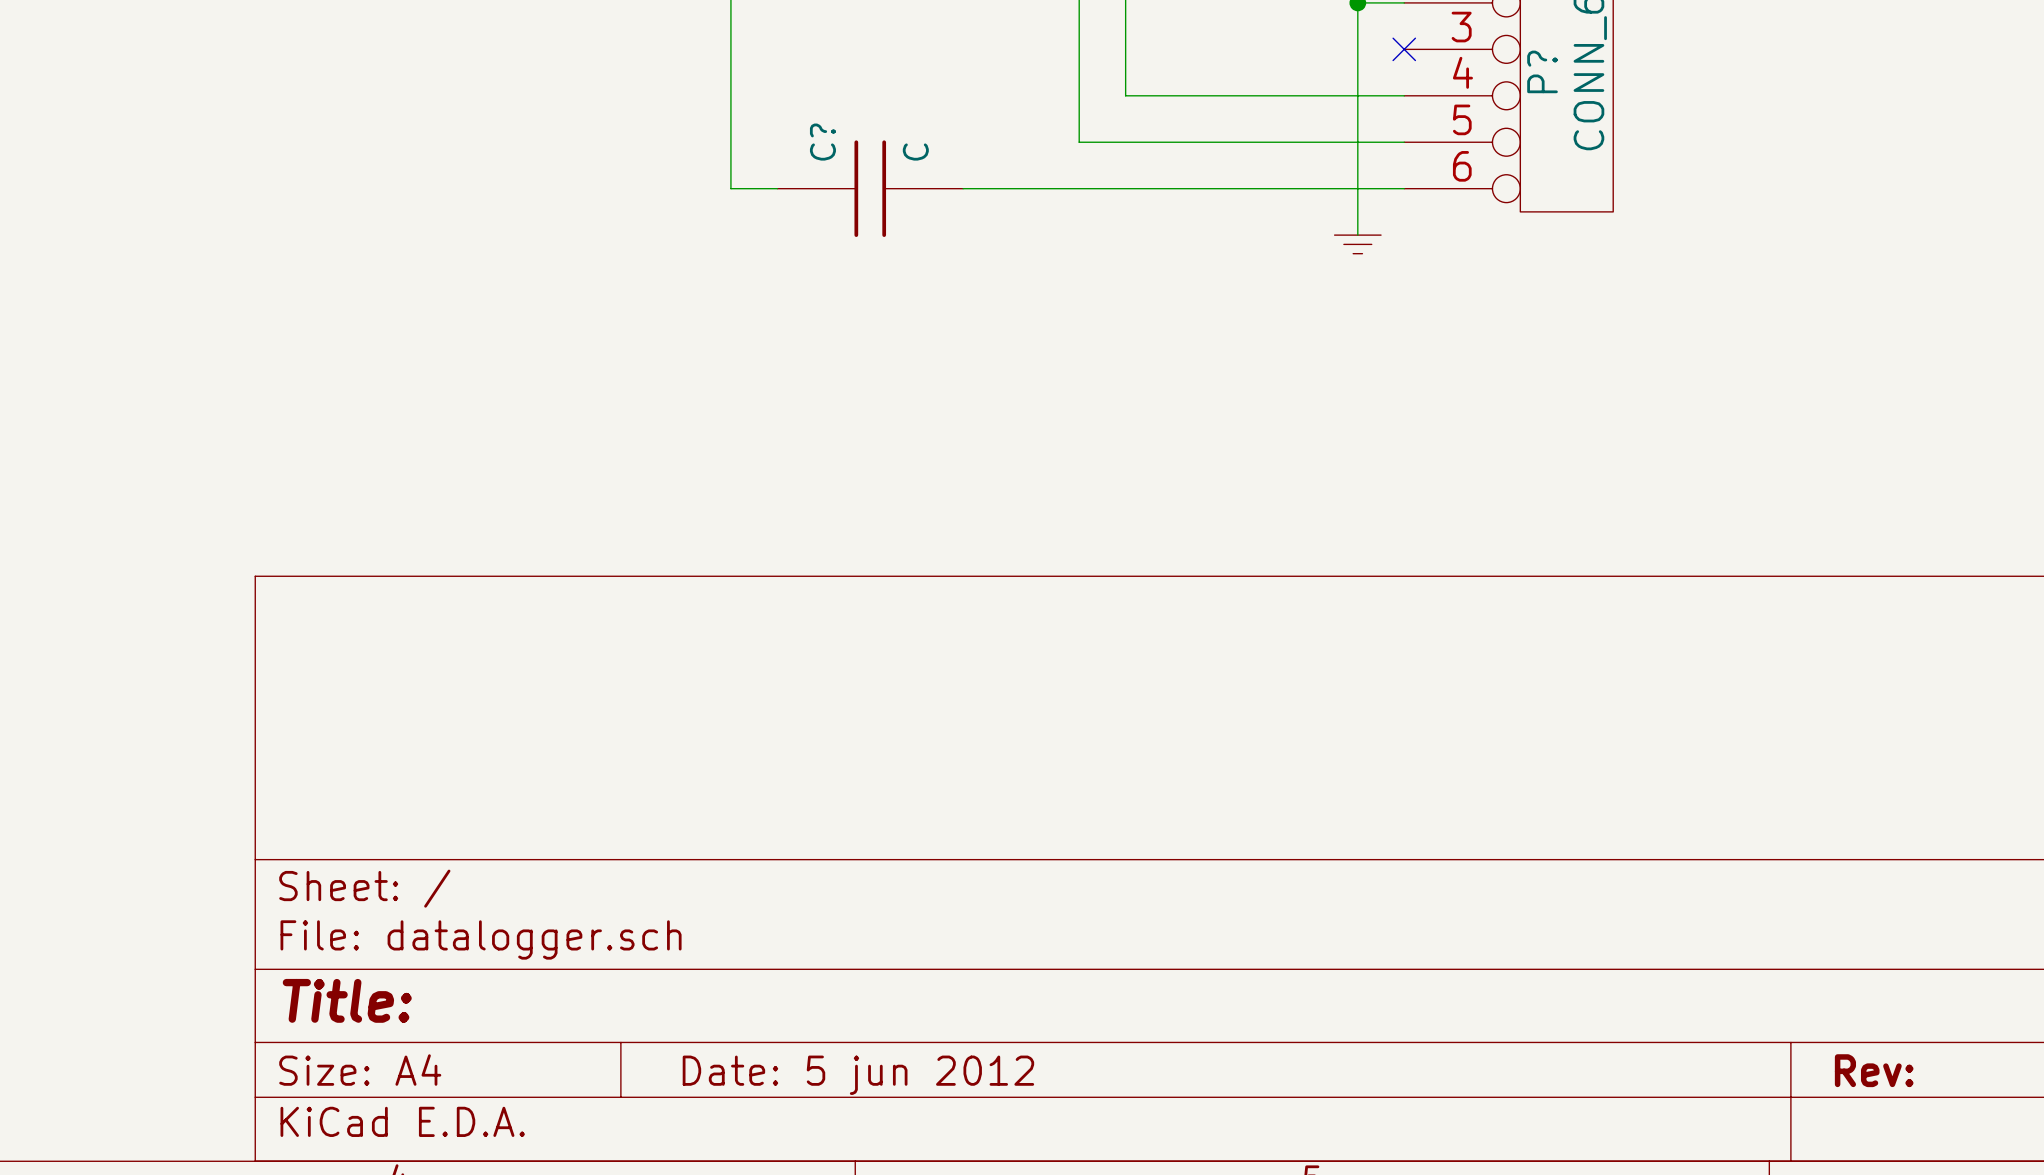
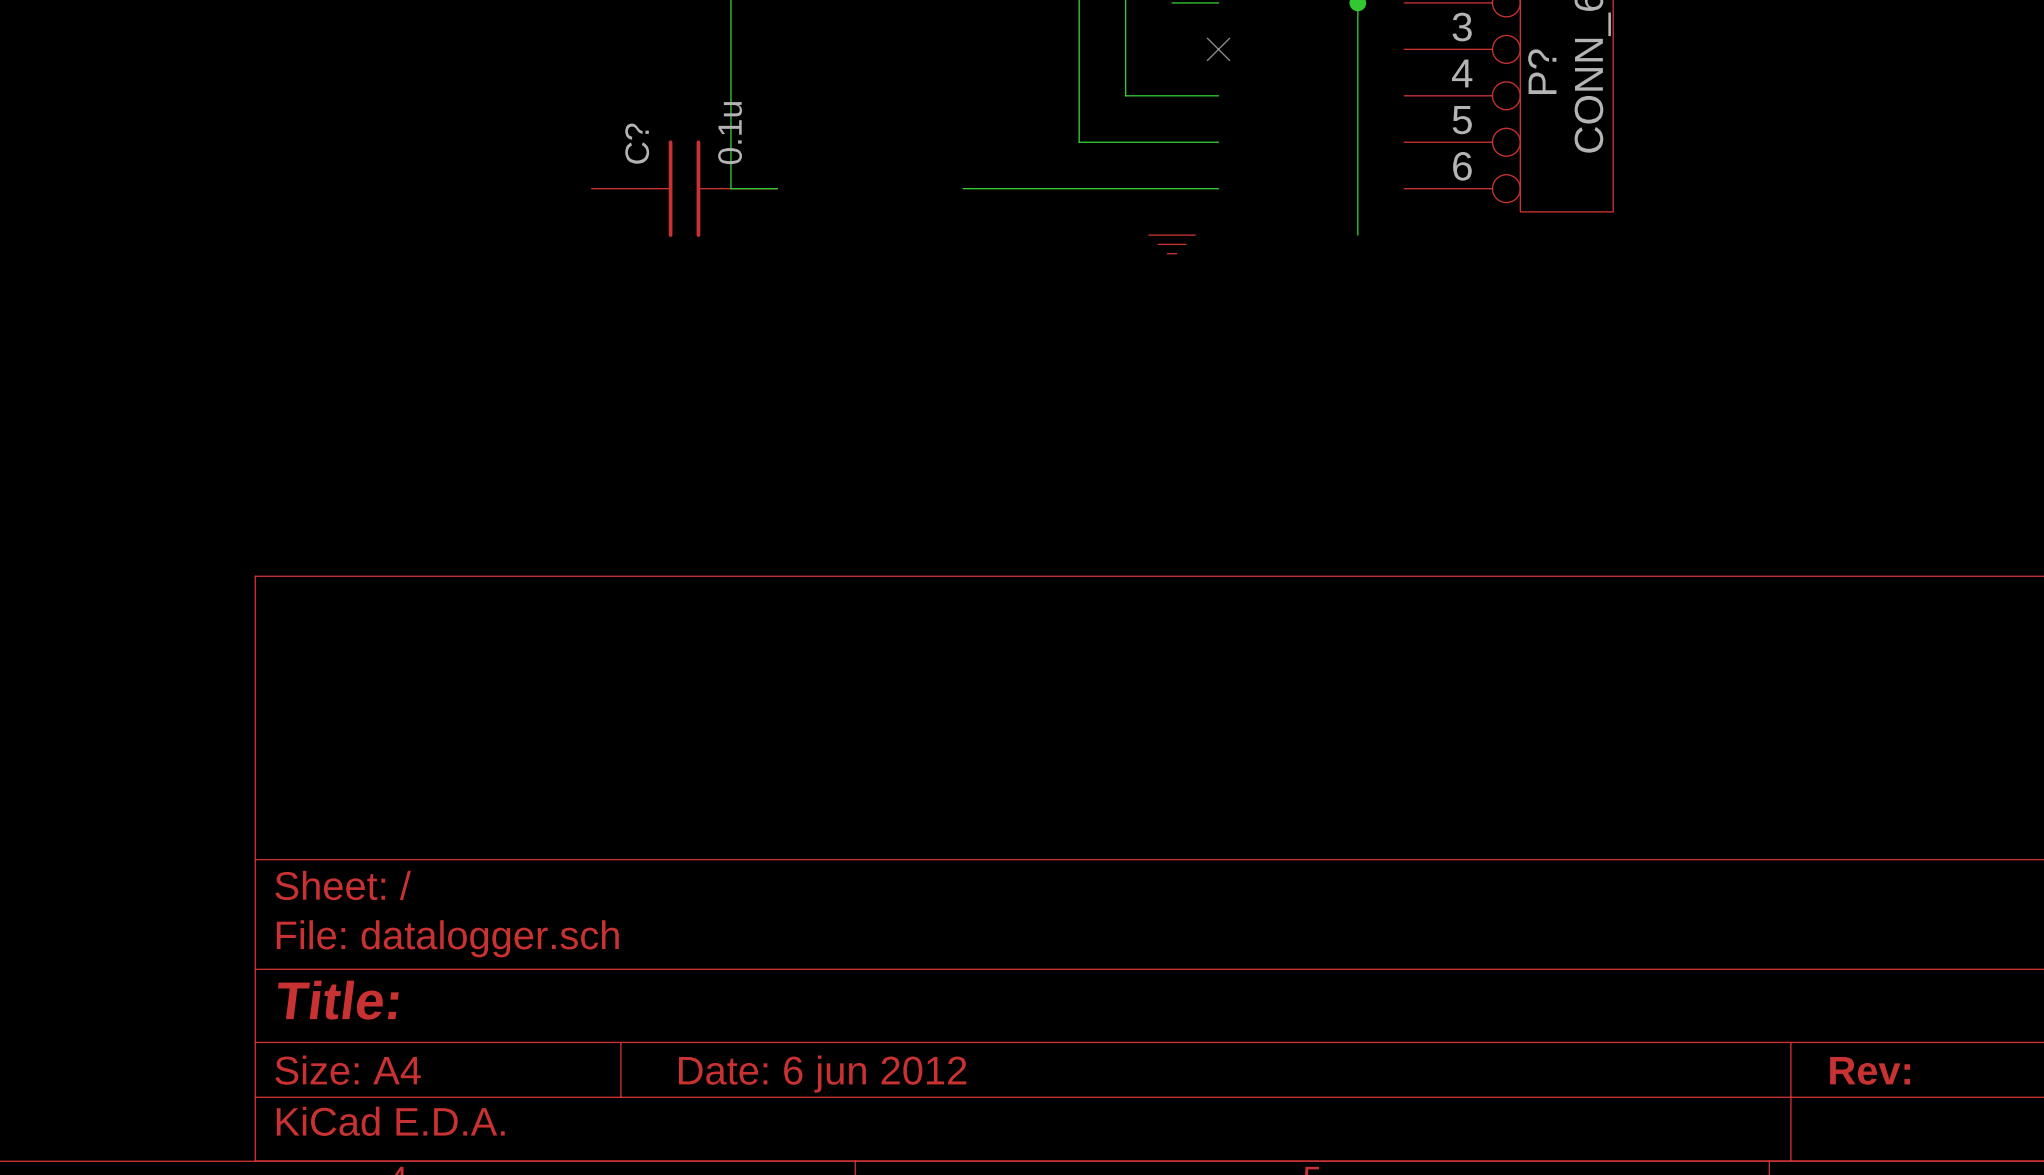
wire: (1357, 2) (1404, 2) -> (1172, 2) (1218, 2)
no-connect mark: none -> (1218, 49)
no-connect mark: (1404, 49) -> none
wire: (1218, 95) (1404, 95) -> none
wire: (1218, 142) (1404, 142) -> none
C?: none -> 0.1u (684, 188)
C?: C (870, 188) -> none
wire: (1218, 188) (1404, 188) -> none
power symbol position: (1357, 244) -> (1172, 244)
title block: Date: 5 jun 2012 (858, 1075) -> Date: 6 jun 2012 (822, 1074)

